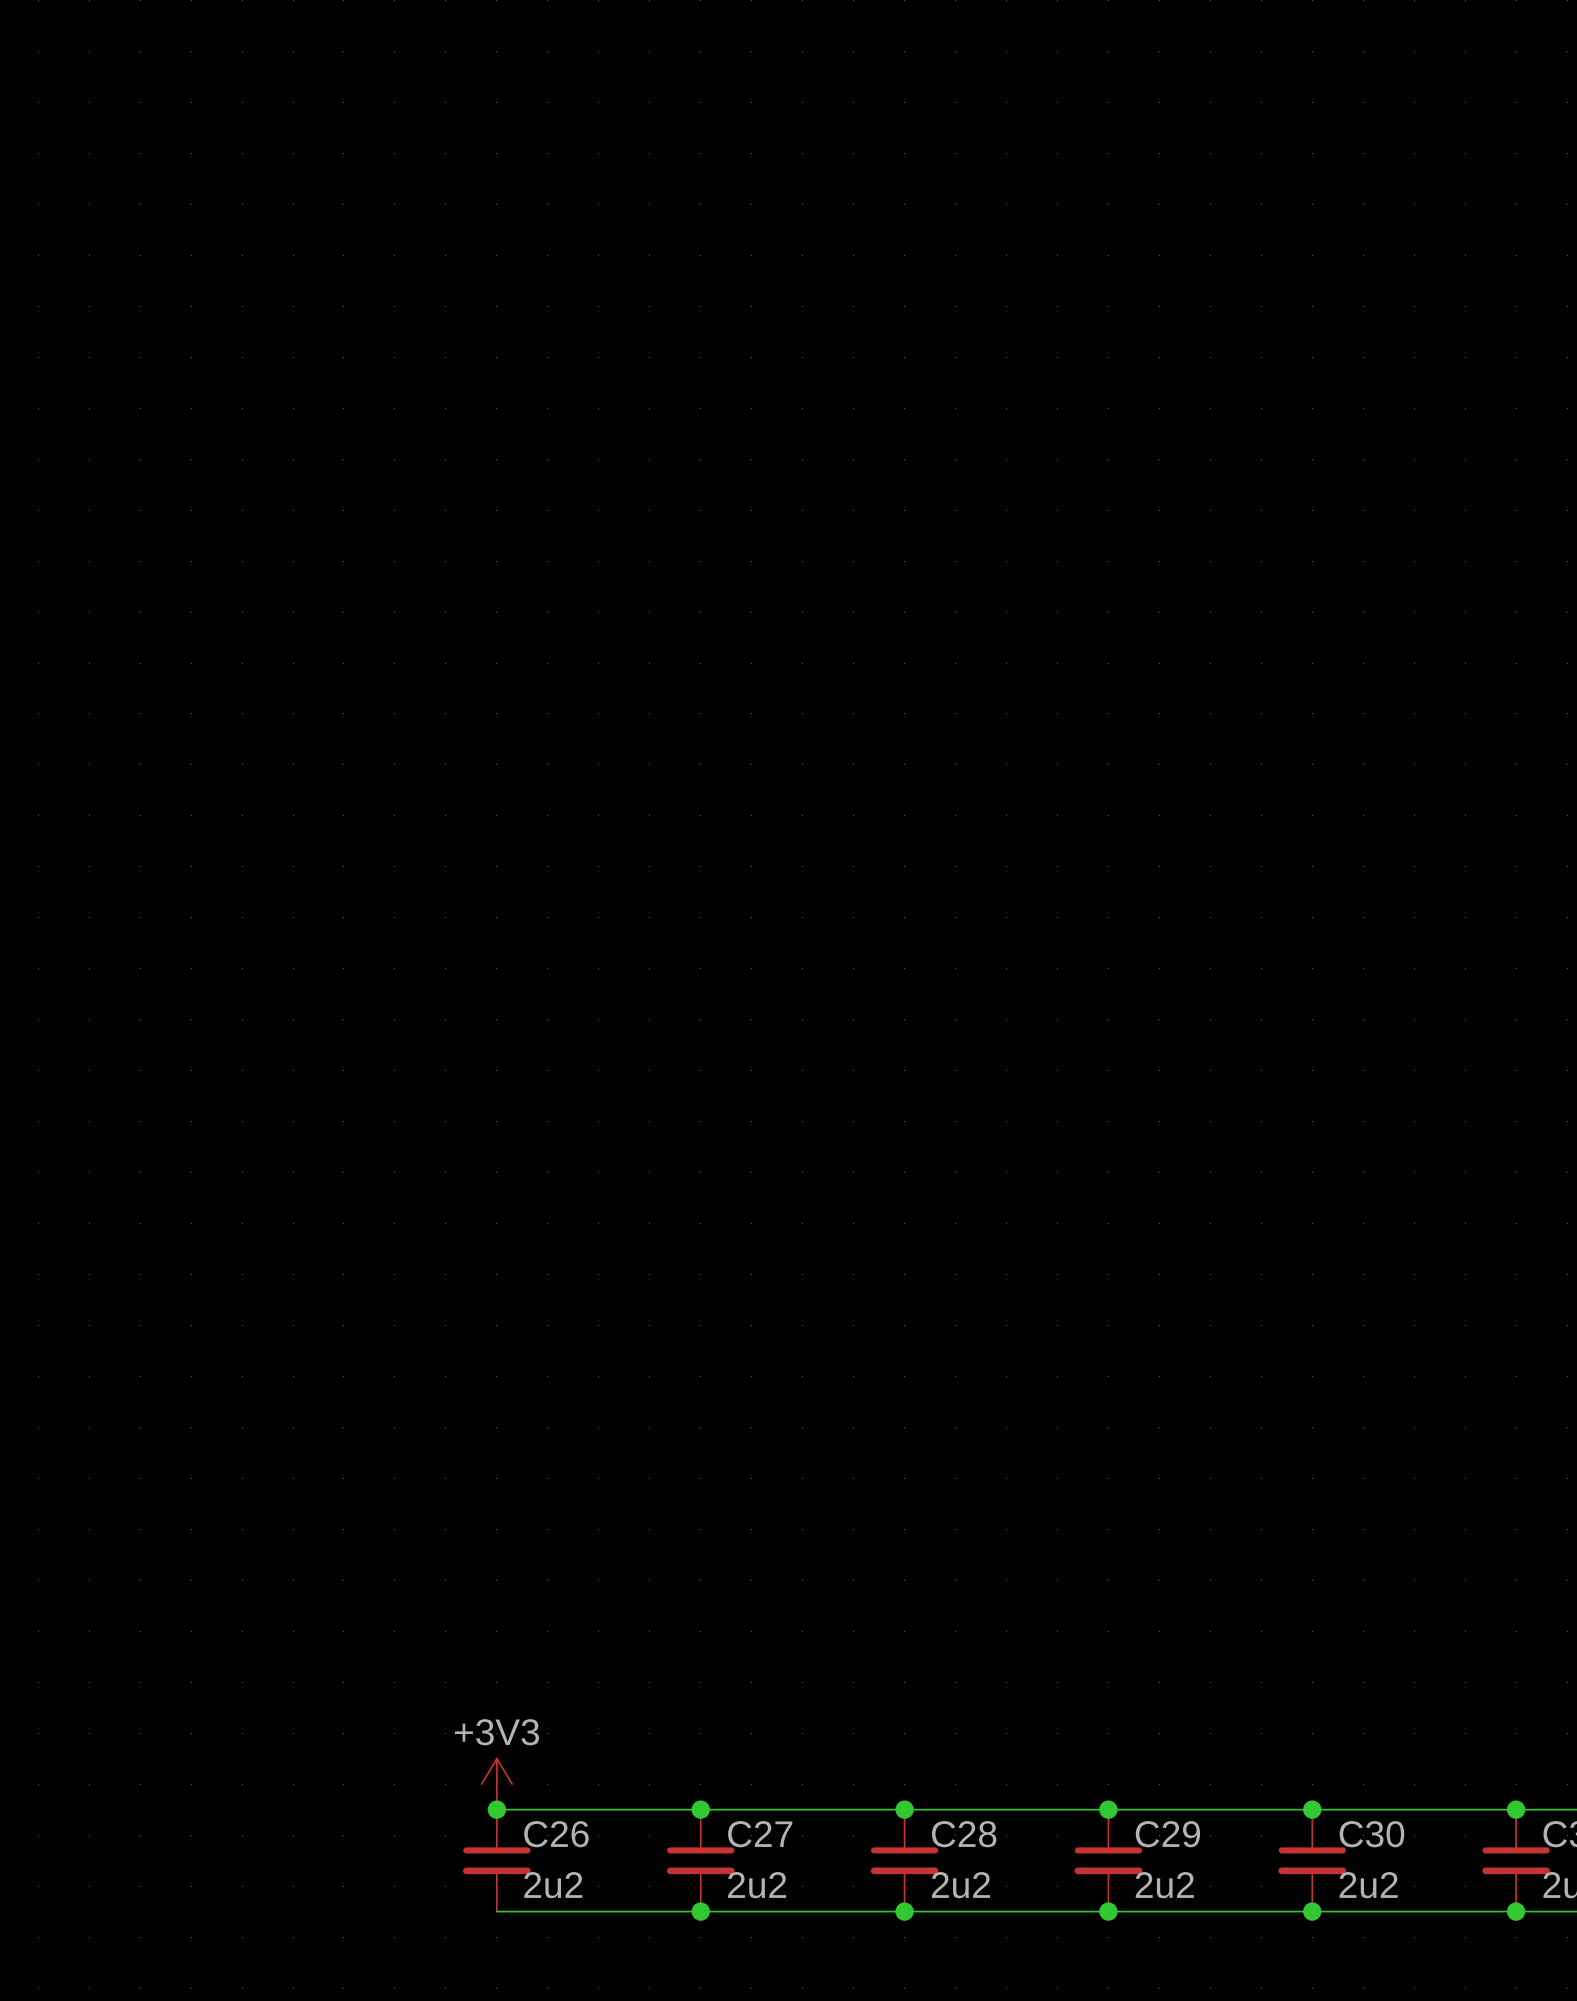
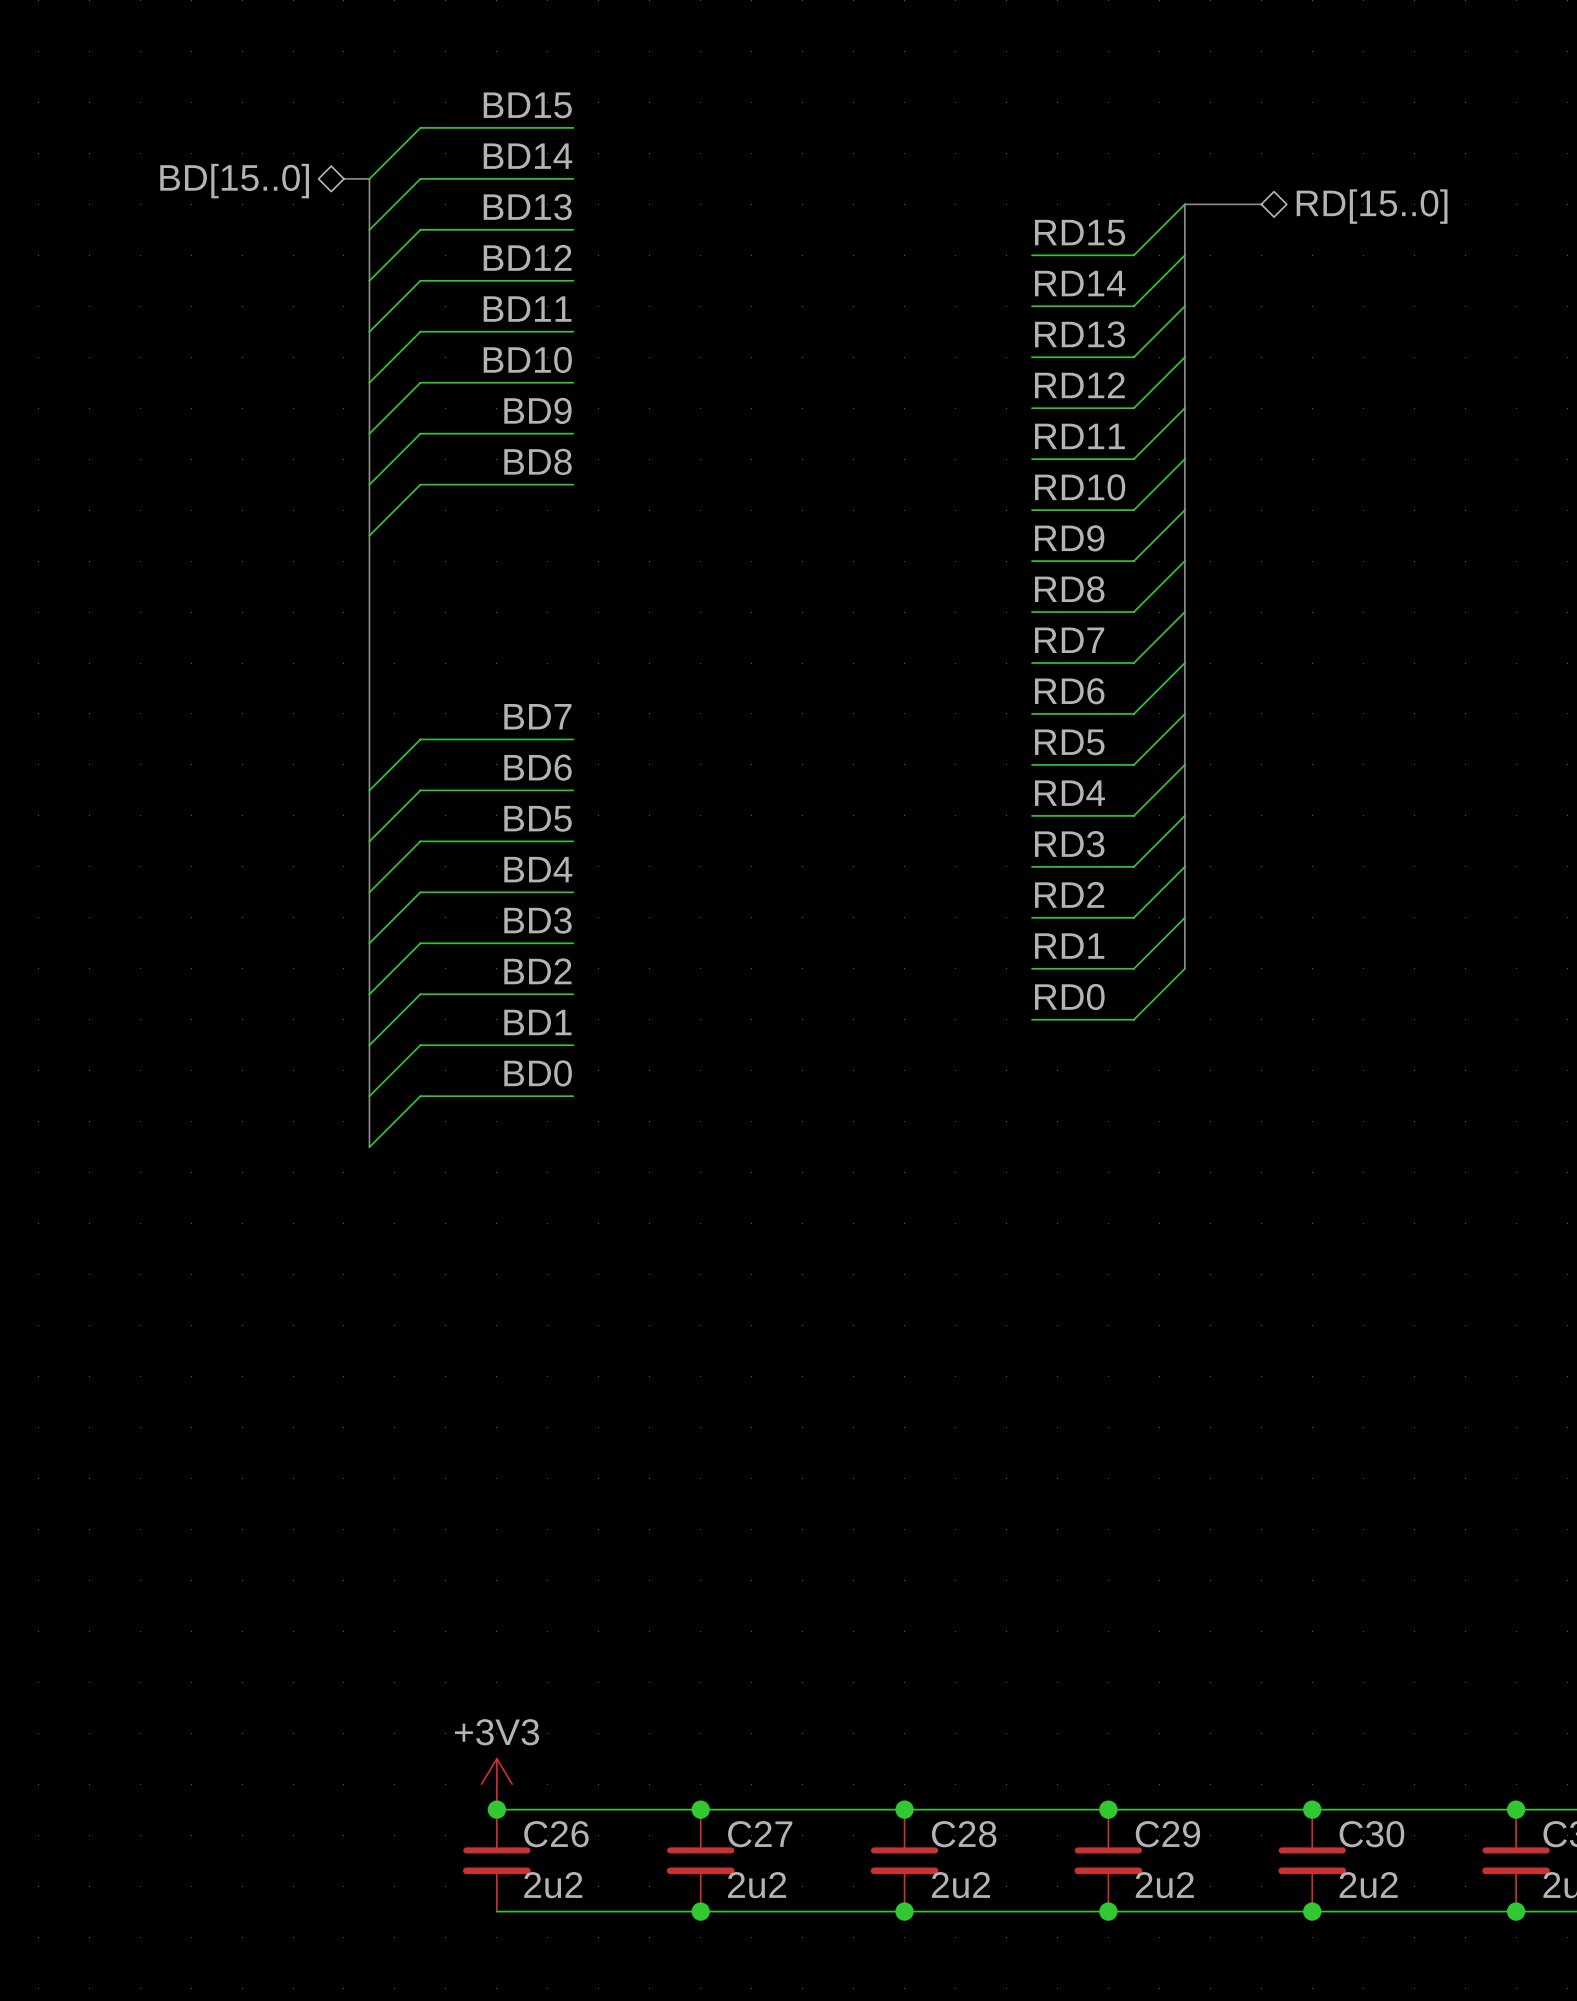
label: none -> BD15 (527, 105)
wire: none -> (573, 127) (420, 127) (369, 178)
label: none -> BD14 (527, 156)
bus: none -> (343, 178) (369, 178) (369, 1147)
wire: none -> (573, 178) (420, 178) (369, 229)
hierarchical label: none -> BD[15..0] (234, 181)
wire: none -> (1184, 204) (1133, 255) (1031, 255)
bus: none -> (1261, 204) (1184, 204) (1184, 968)
hierarchical label: none -> RD[15..0] (1372, 206)
label: none -> BD13 (527, 207)
wire: none -> (573, 229) (420, 229) (369, 280)
label: none -> RD15 (1080, 232)
wire: none -> (1184, 255) (1133, 306) (1031, 306)
label: none -> BD12 (527, 257)
wire: none -> (573, 280) (420, 280) (369, 331)
label: none -> RD14 (1080, 283)
wire: none -> (1184, 306) (1133, 357) (1031, 357)
label: none -> BD11 (527, 309)
wire: none -> (573, 331) (420, 331) (369, 382)
label: none -> RD13 (1080, 334)
wire: none -> (1184, 357) (1133, 408) (1031, 408)
label: none -> BD10 (527, 359)
wire: none -> (573, 382) (420, 382) (369, 433)
label: none -> RD12 (1079, 385)
wire: none -> (1184, 408) (1133, 459) (1031, 459)
label: none -> BD9 (537, 410)
wire: none -> (573, 433) (420, 433) (369, 484)
label: none -> RD11 (1079, 436)
wire: none -> (1184, 459) (1133, 510) (1031, 510)
label: none -> BD8 (538, 461)
wire: none -> (573, 484) (420, 484) (369, 535)
label: none -> RD10 (1080, 487)
wire: none -> (1184, 510) (1133, 561) (1031, 561)
label: none -> RD9 (1069, 538)
wire: none -> (1184, 561) (1133, 612) (1031, 612)
label: none -> RD8 (1069, 589)
wire: none -> (1184, 612) (1133, 663) (1031, 663)
label: none -> RD7 (1069, 640)
wire: none -> (1184, 663) (1133, 713) (1031, 713)
label: none -> RD6 (1069, 691)
wire: none -> (1184, 713) (1133, 764) (1031, 764)
label: none -> BD7 (537, 716)
wire: none -> (573, 739) (420, 739) (369, 790)
label: none -> RD5 (1069, 742)
wire: none -> (1184, 764) (1133, 815) (1031, 815)
label: none -> BD6 (538, 767)
wire: none -> (573, 790) (420, 790) (369, 841)
label: none -> RD4 (1070, 793)
wire: none -> (1184, 815) (1133, 866) (1031, 866)
label: none -> BD5 (538, 818)
wire: none -> (573, 841) (420, 841) (369, 892)
label: none -> RD3 (1069, 844)
wire: none -> (1184, 866) (1133, 917) (1031, 917)
label: none -> BD4 (538, 869)
wire: none -> (573, 892) (420, 892) (369, 943)
label: none -> RD2 (1069, 894)
wire: none -> (1184, 917) (1133, 968) (1031, 968)
label: none -> BD3 (538, 920)
wire: none -> (573, 943) (420, 943) (369, 994)
label: none -> RD1 (1069, 946)
wire: none -> (1184, 968) (1133, 1019) (1031, 1019)
label: none -> BD2 (537, 971)
wire: none -> (573, 994) (420, 994) (369, 1045)
label: none -> RD0 (1069, 997)
label: none -> BD1 (537, 1022)
wire: none -> (573, 1045) (420, 1045) (369, 1096)
label: none -> BD0 (538, 1073)
wire: none -> (573, 1096) (420, 1096) (369, 1147)

